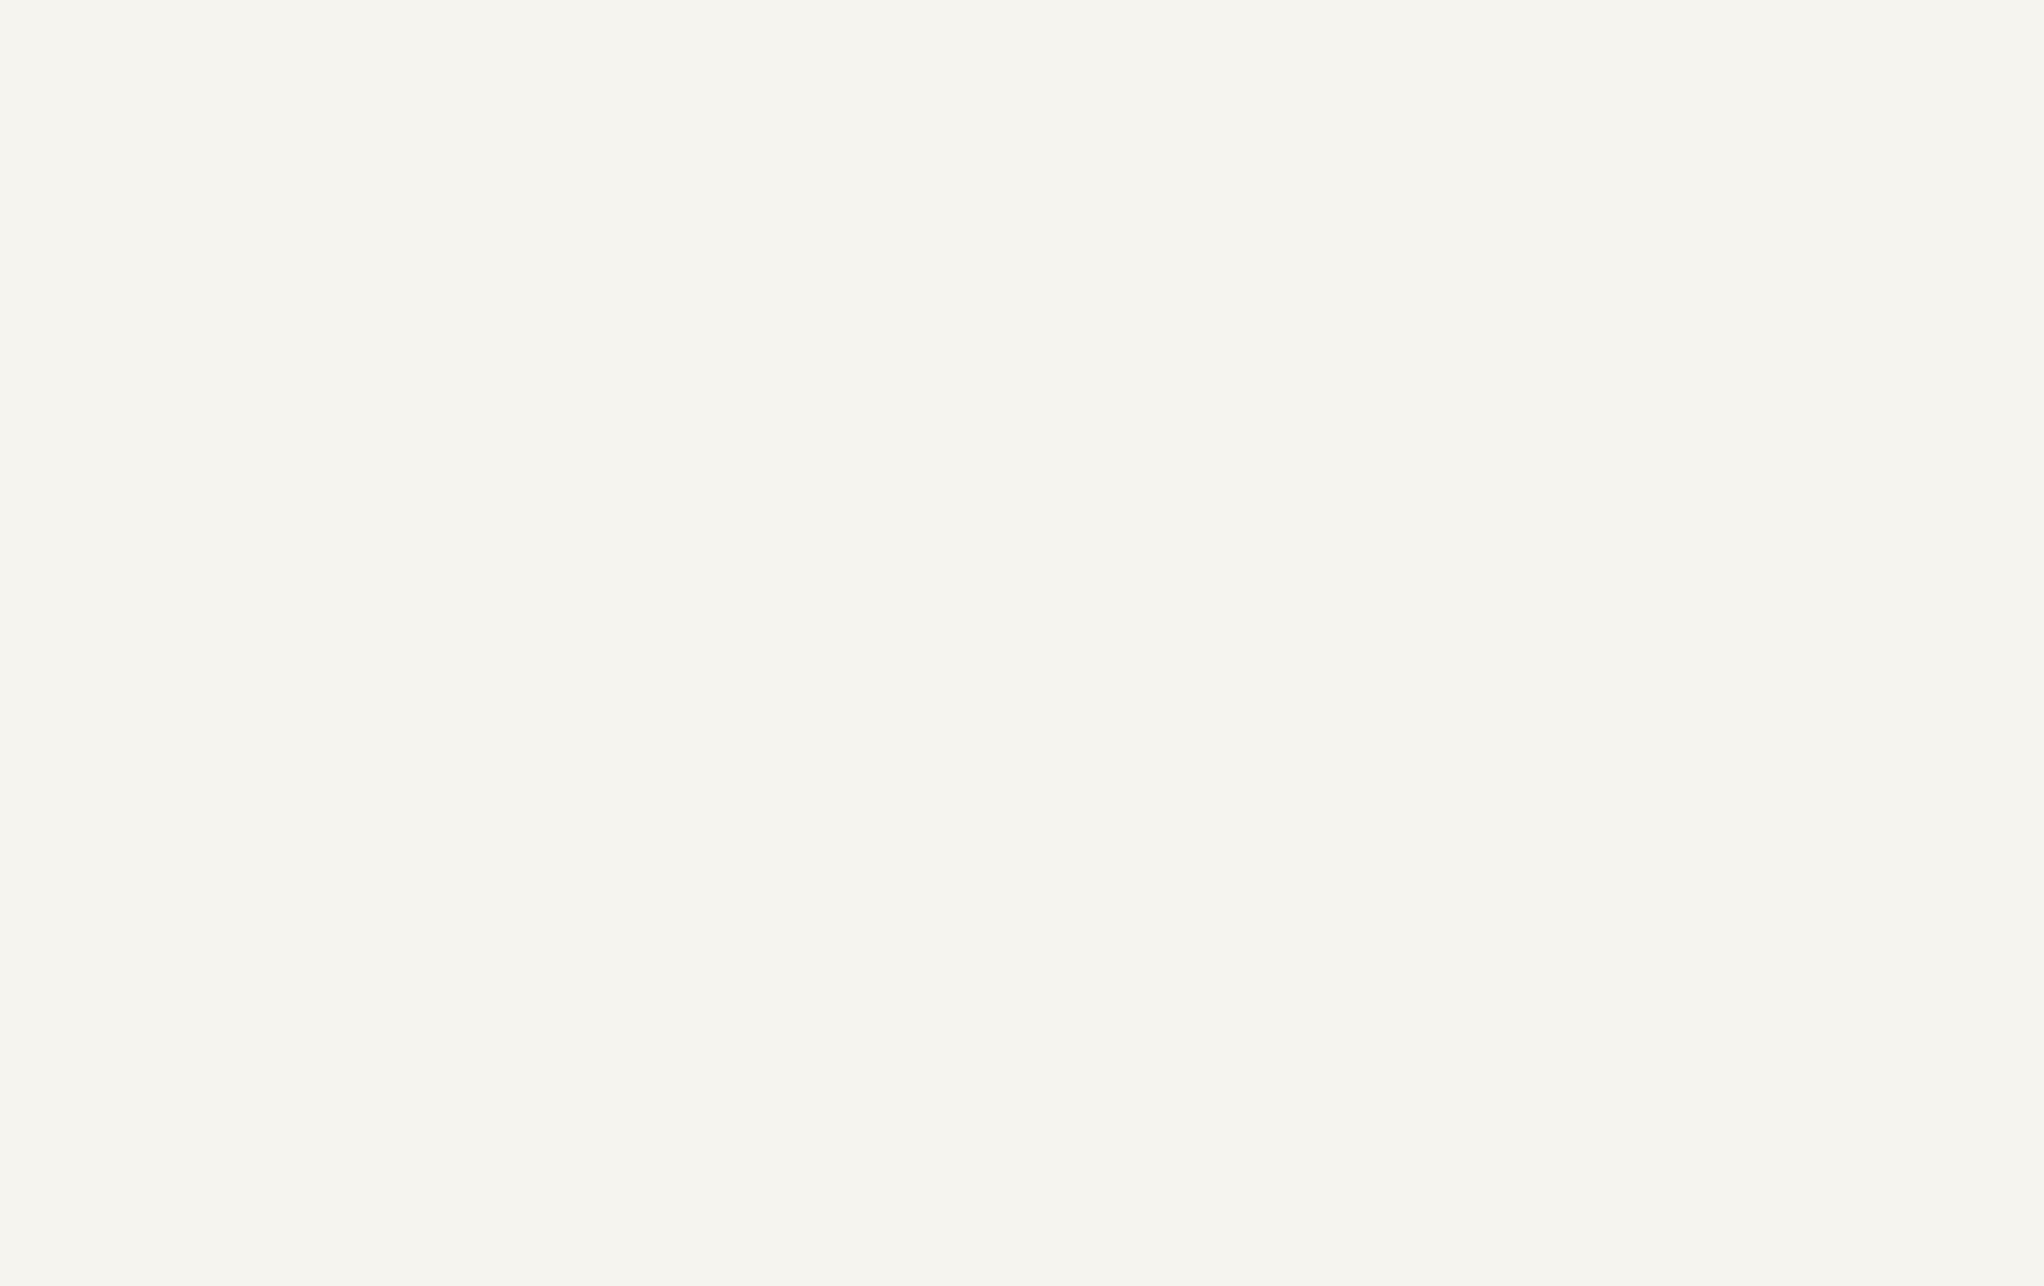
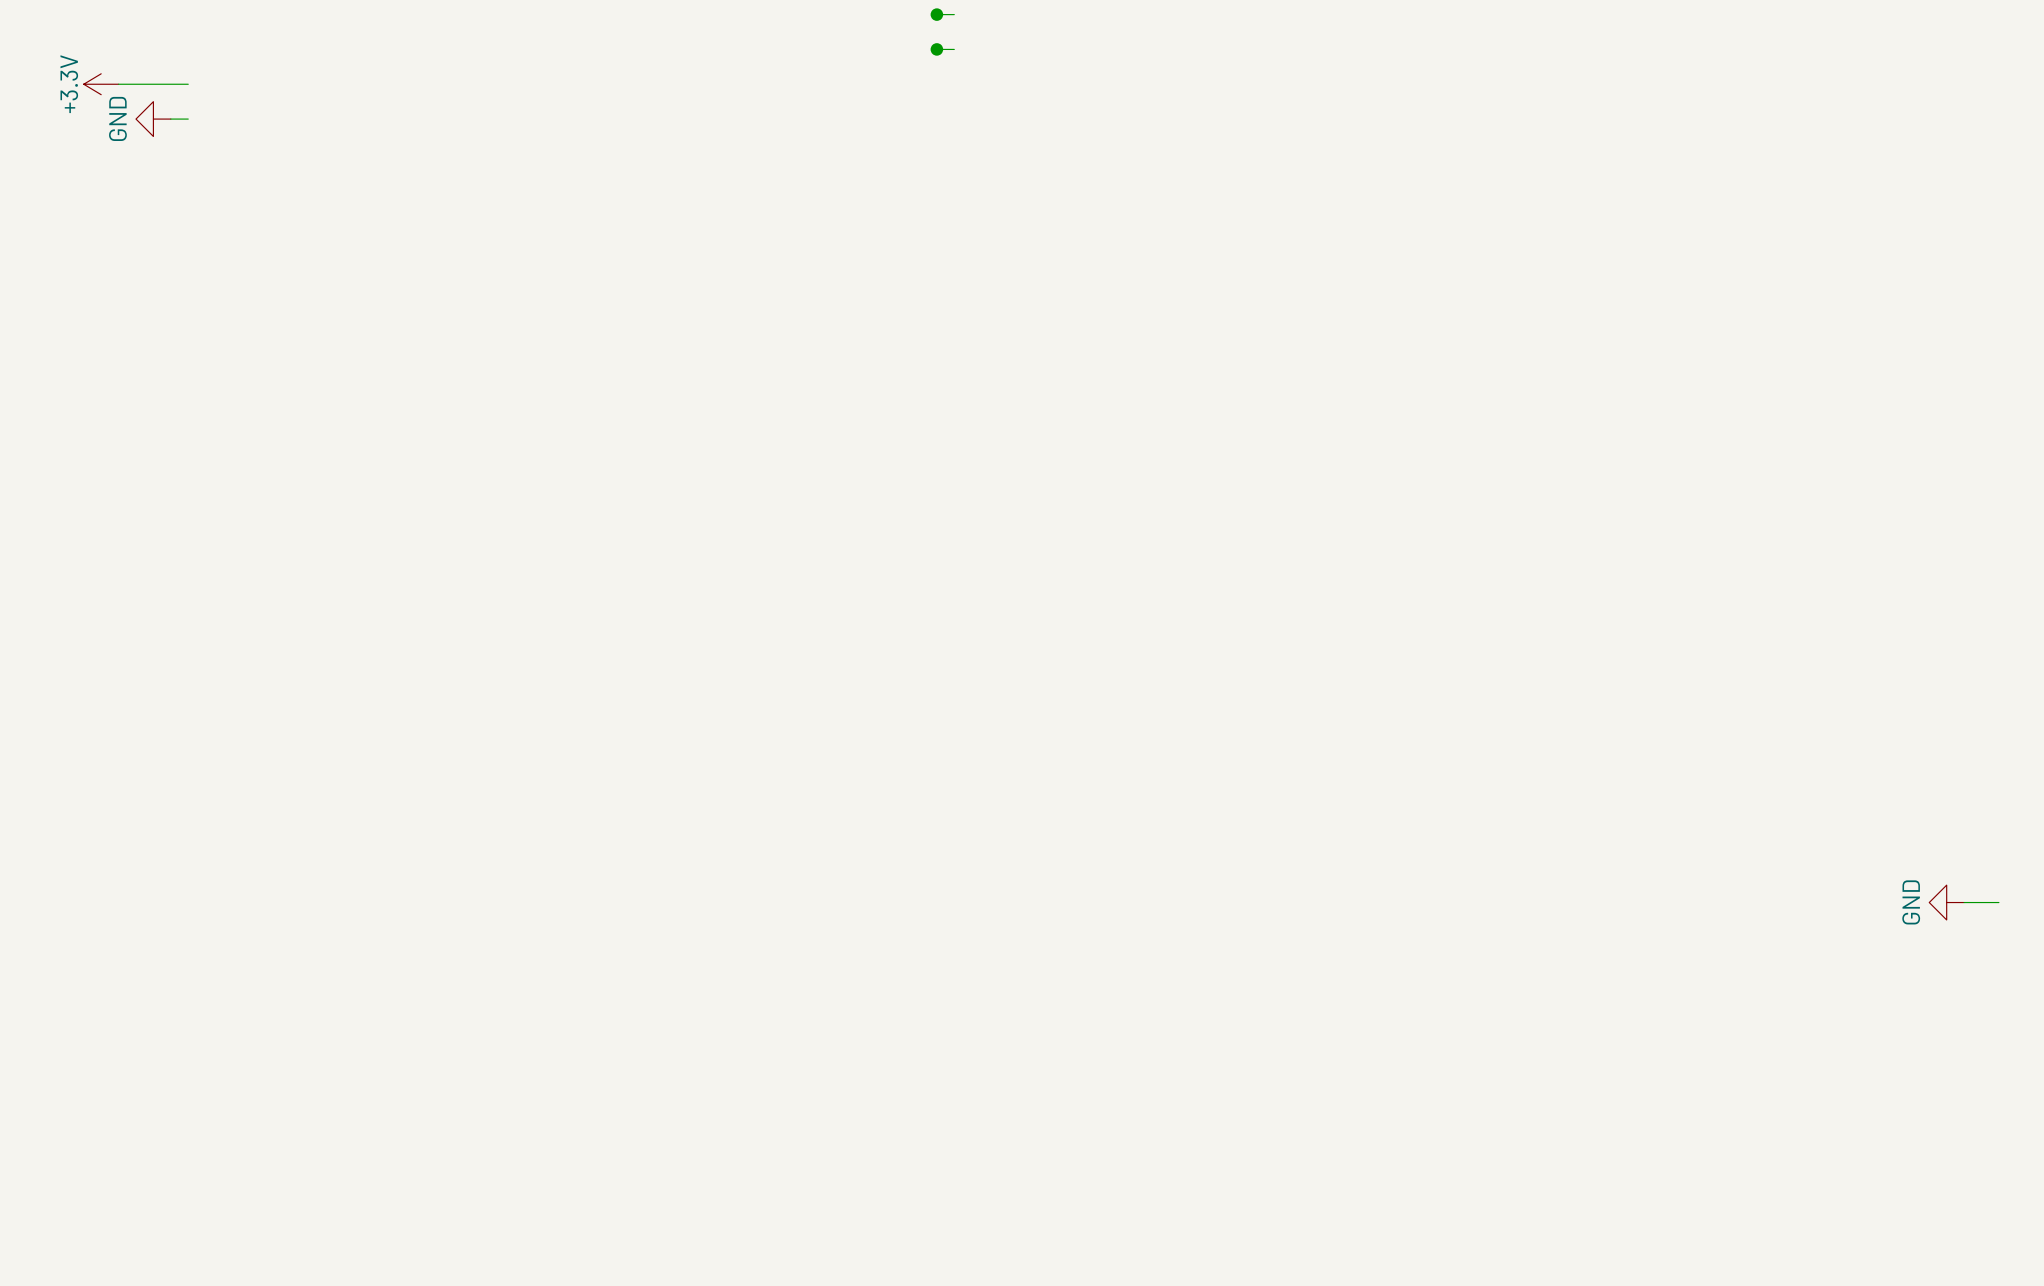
wire: none -> (936, 14) (954, 14)
junction: none -> (936, 14)
wire: none -> (936, 49) (954, 49)
junction: none -> (936, 49)
power symbol: none -> +3.3V (101, 84)
wire: none -> (118, 84) (188, 84)
power symbol: none -> GND (153, 119)
wire: none -> (170, 119) (188, 119)
power symbol: none -> GND (1946, 902)
wire: none -> (1964, 902) (1998, 902)

